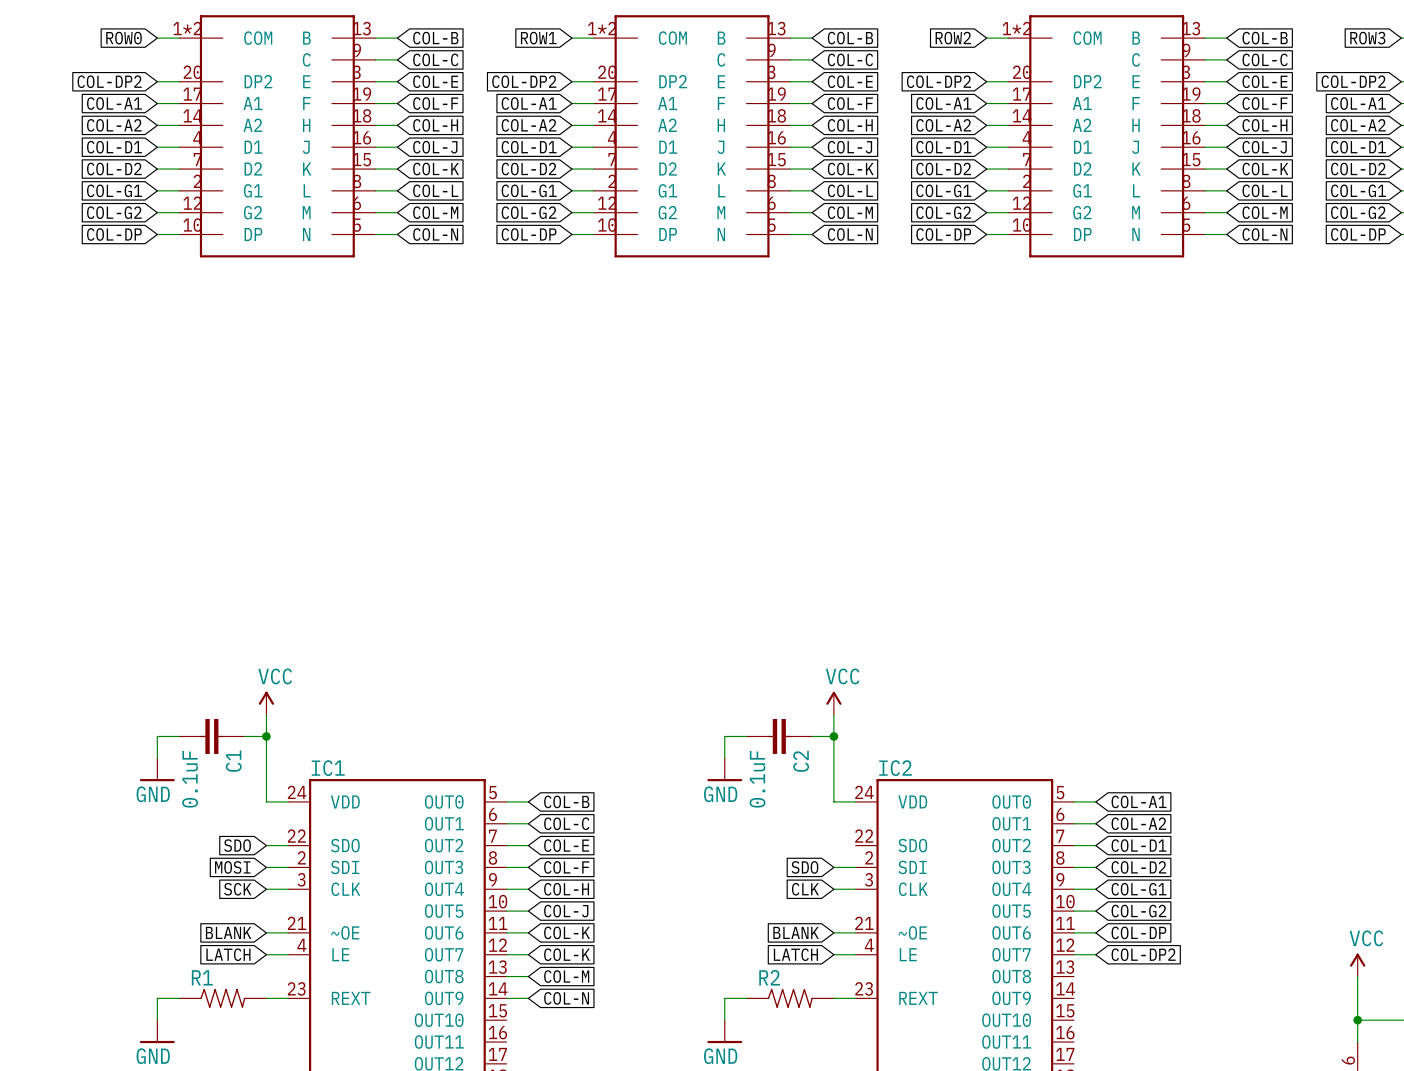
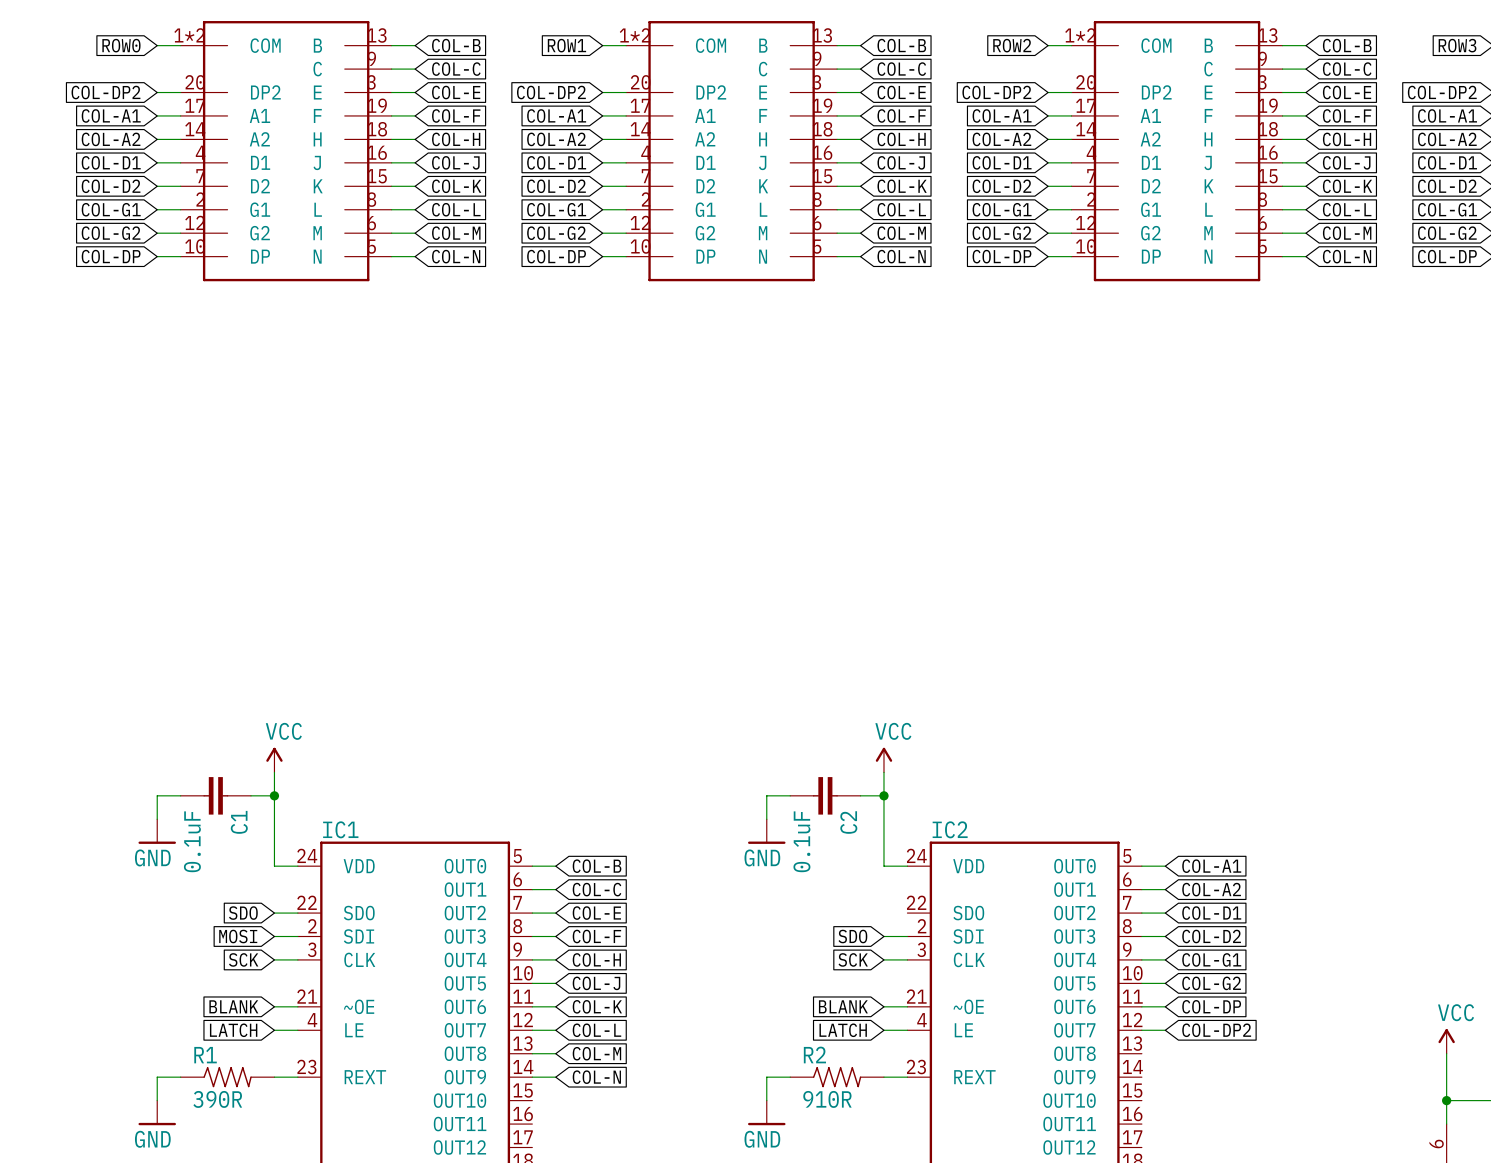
global label: CLK (805, 889) -> SCK (853, 959)
global label: COL-K (567, 954) -> COL-L (596, 1030)
R1 value: none -> 390R (217, 1099)
R2 value: none -> 910R (827, 1099)

